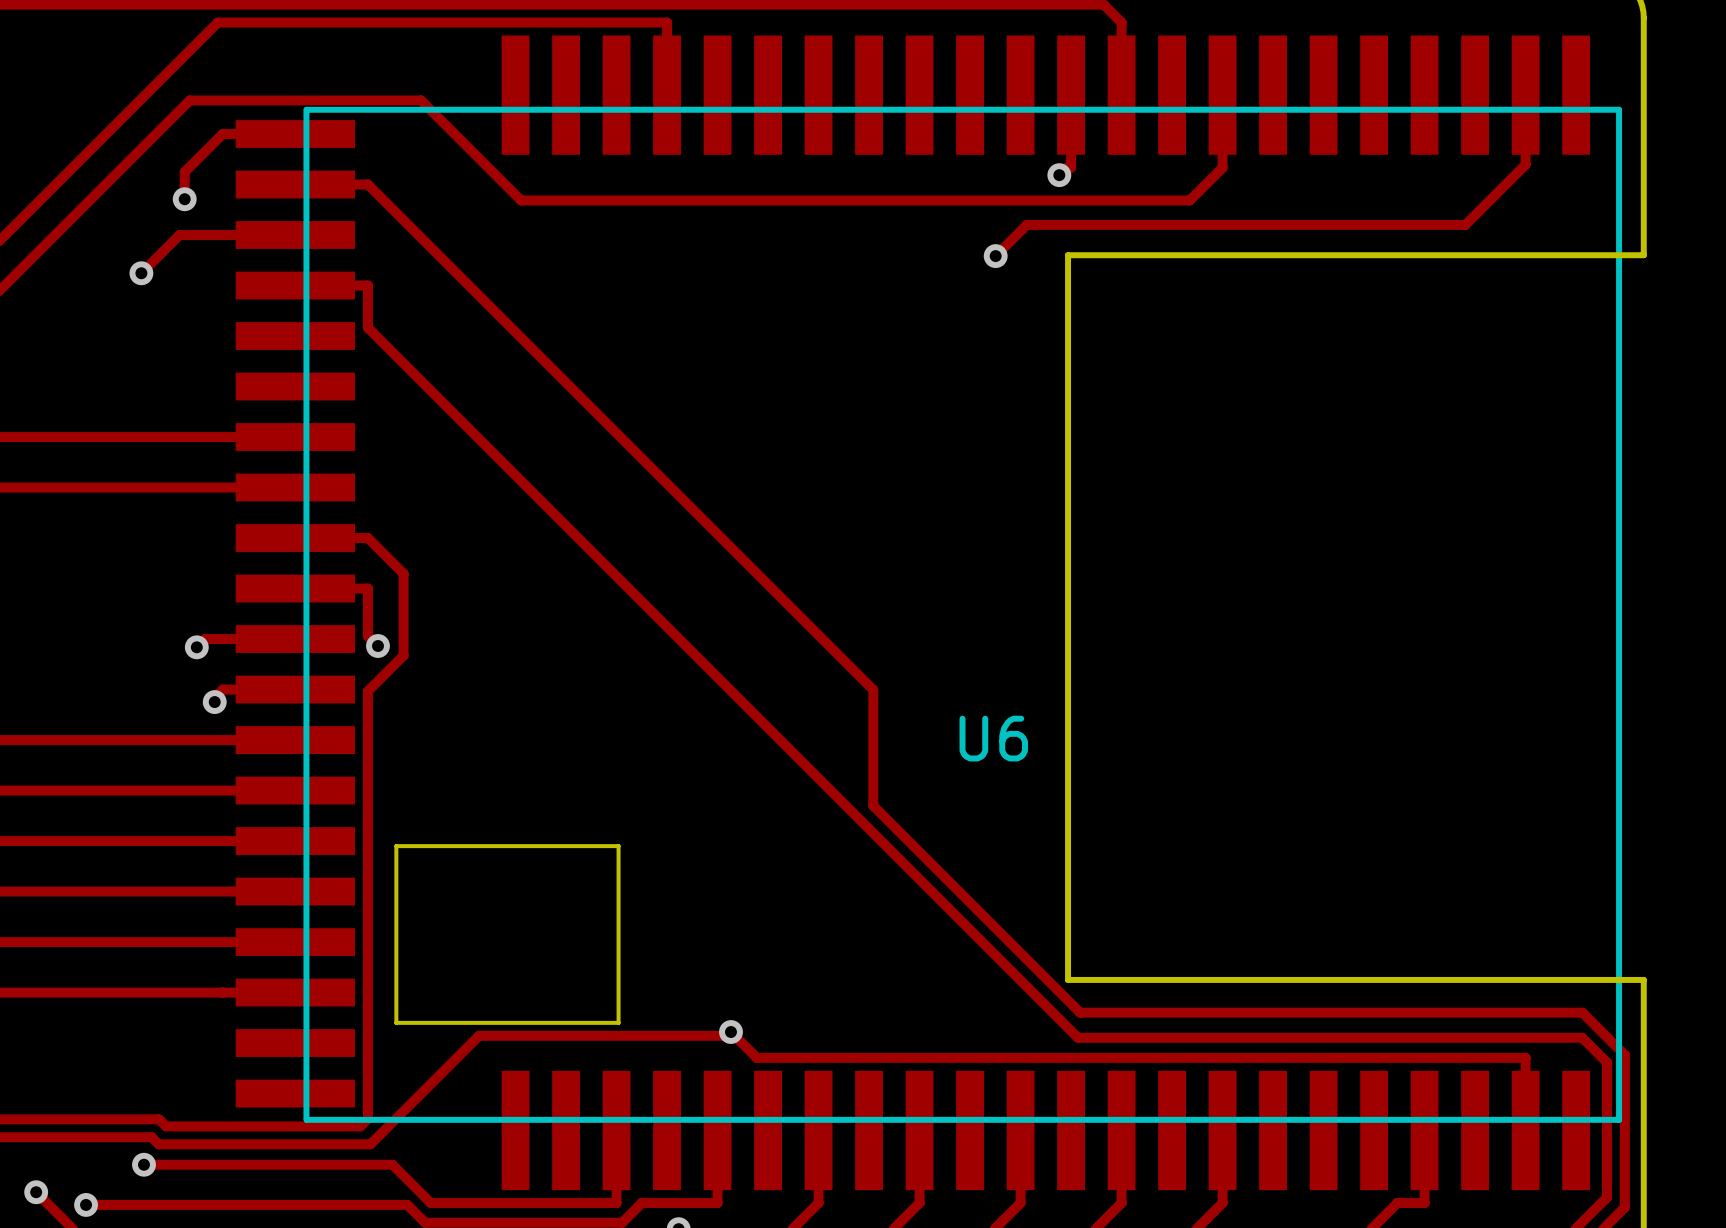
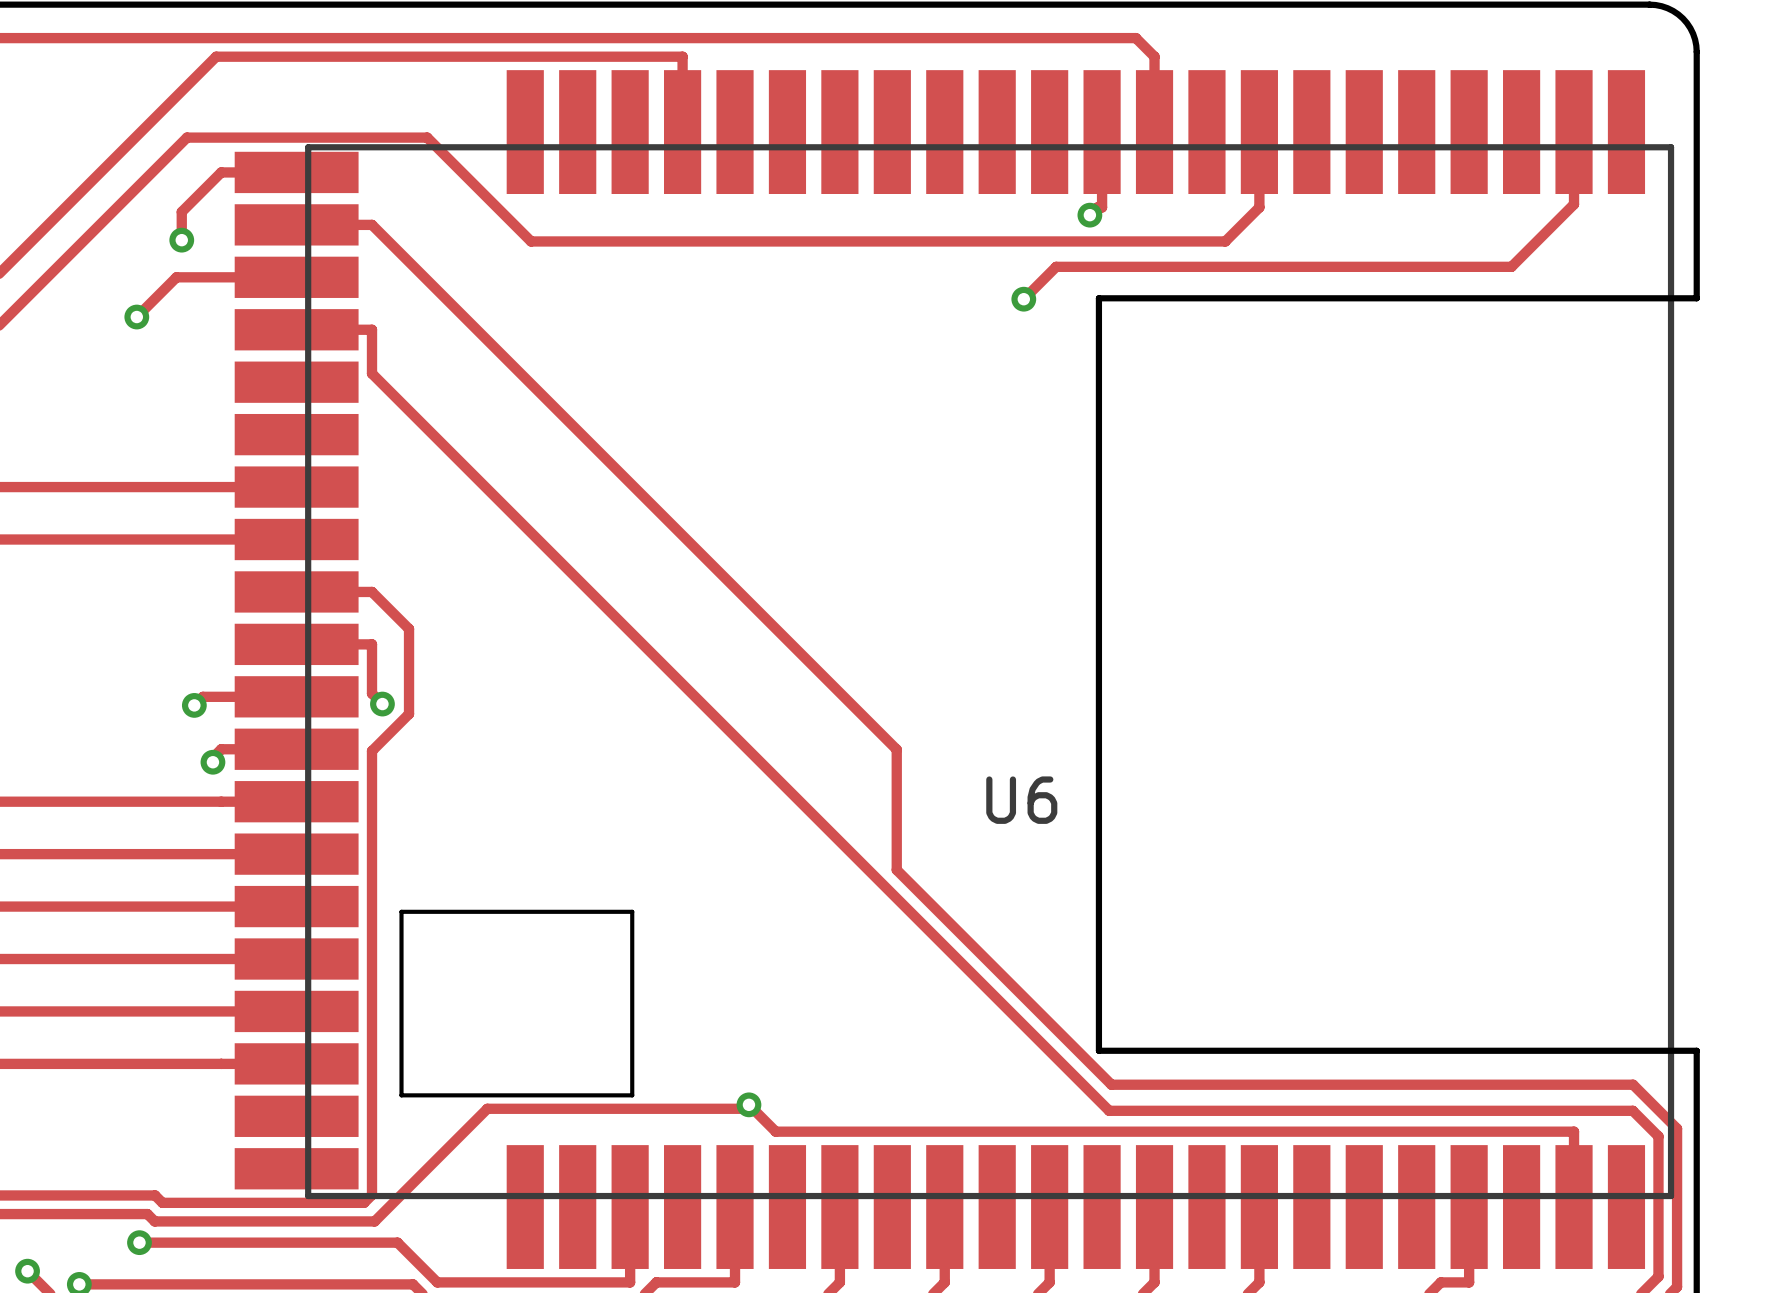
U6 footprint: [235, 35, 1623, 1191] -> [234, 70, 1675, 1269]

